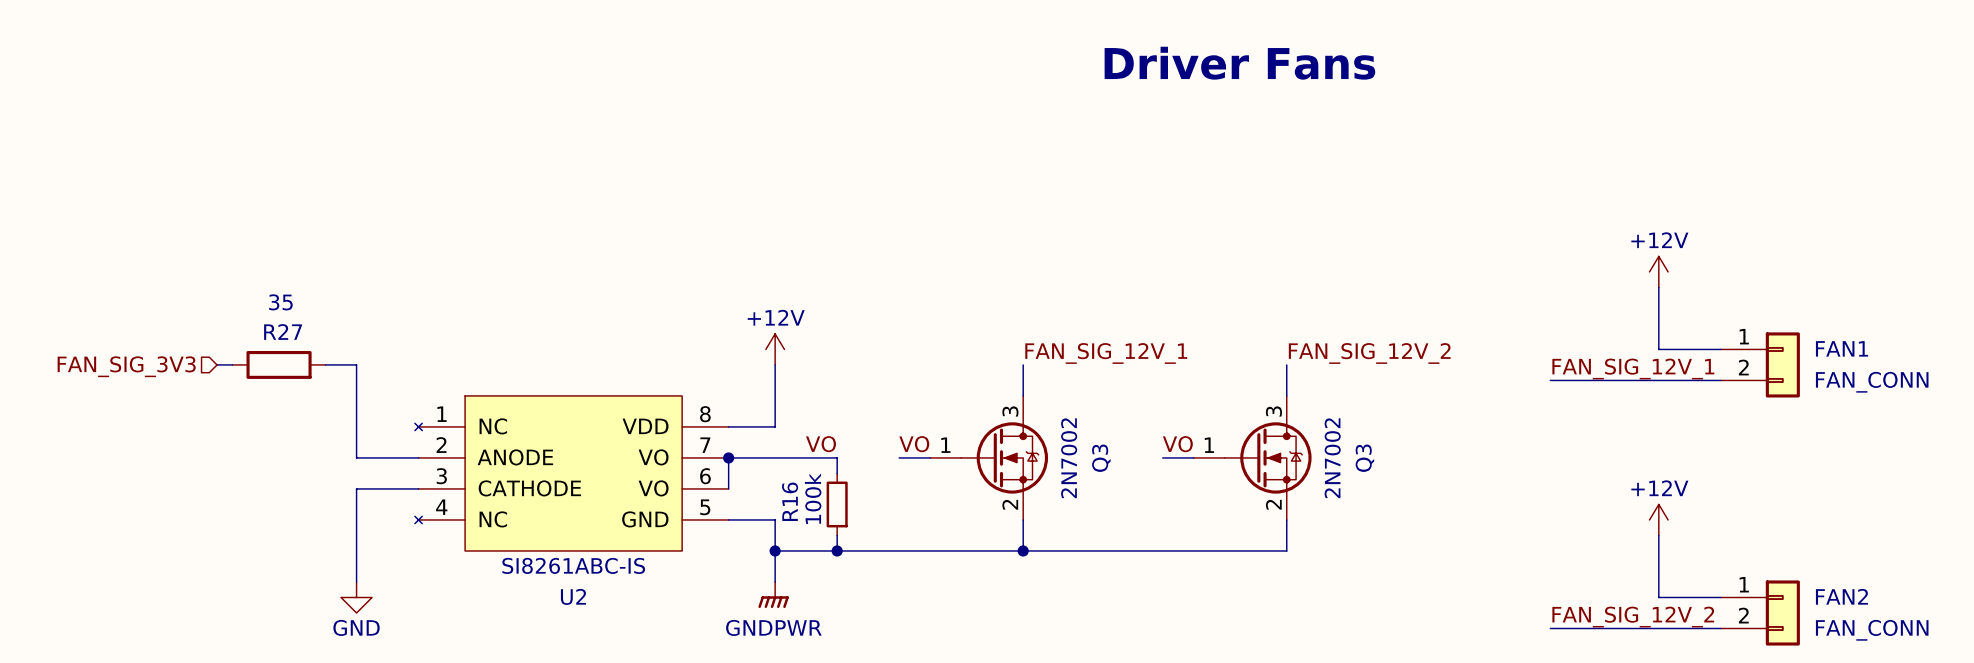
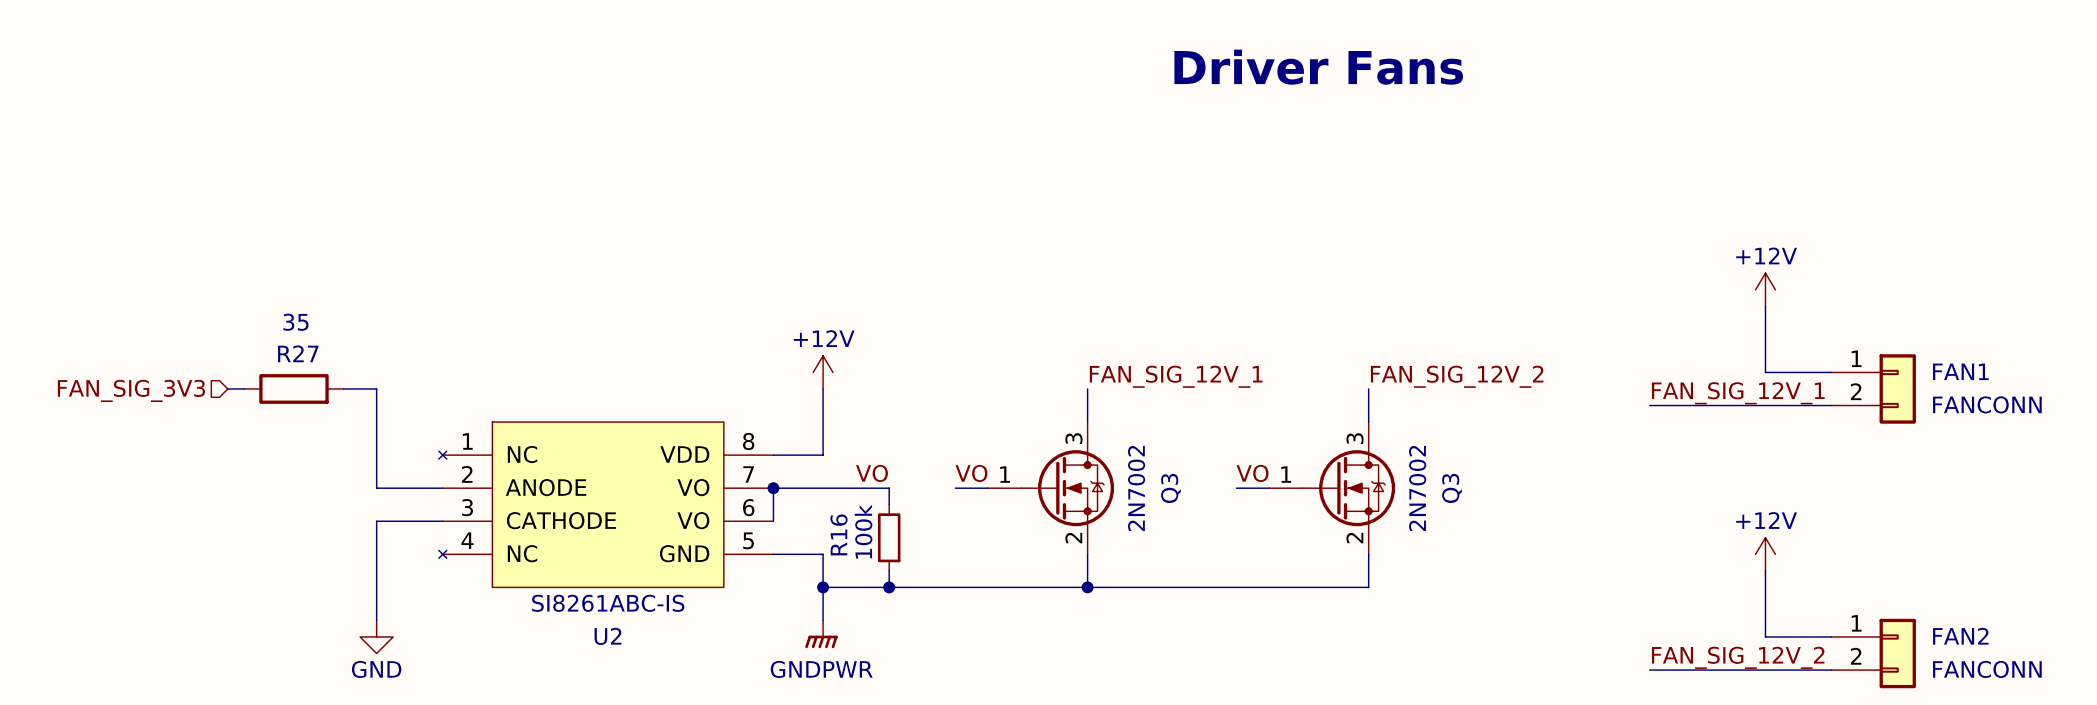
FAN1 value: FAN_CONN (1872, 382) -> FANCONN (1987, 404)
FAN2 value: FAN_CONN (1872, 630) -> FANCONN (1987, 669)

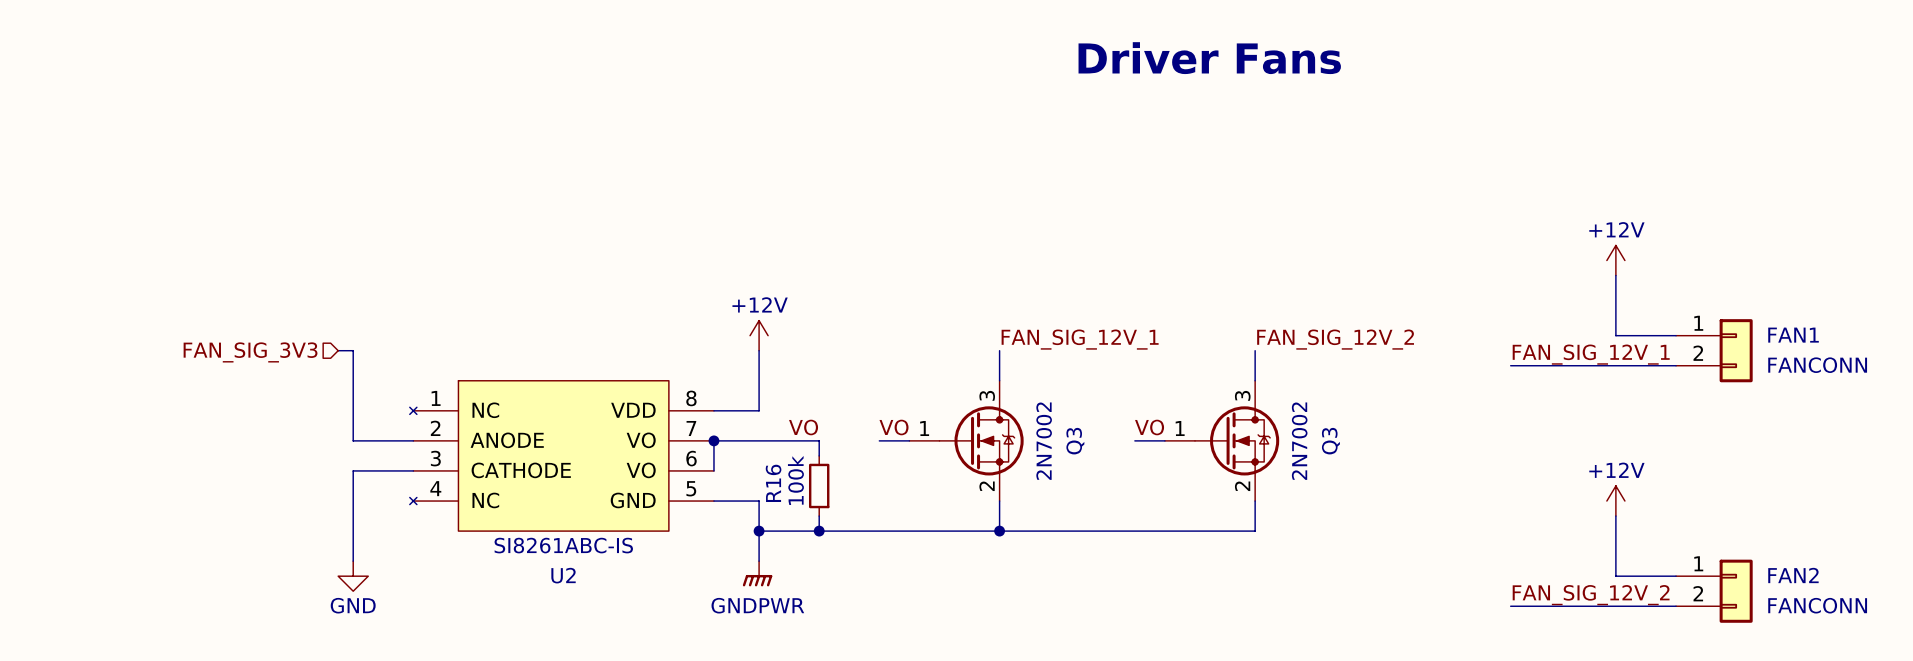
wire: (227, 388) (244, 388) -> none
R27: 35 (293, 388) -> none
wire: (343, 388) (360, 388) -> none
hierarchical label position: FAN_SIG_3V3 (131, 390) -> FAN_SIG_3V3 (250, 352)

